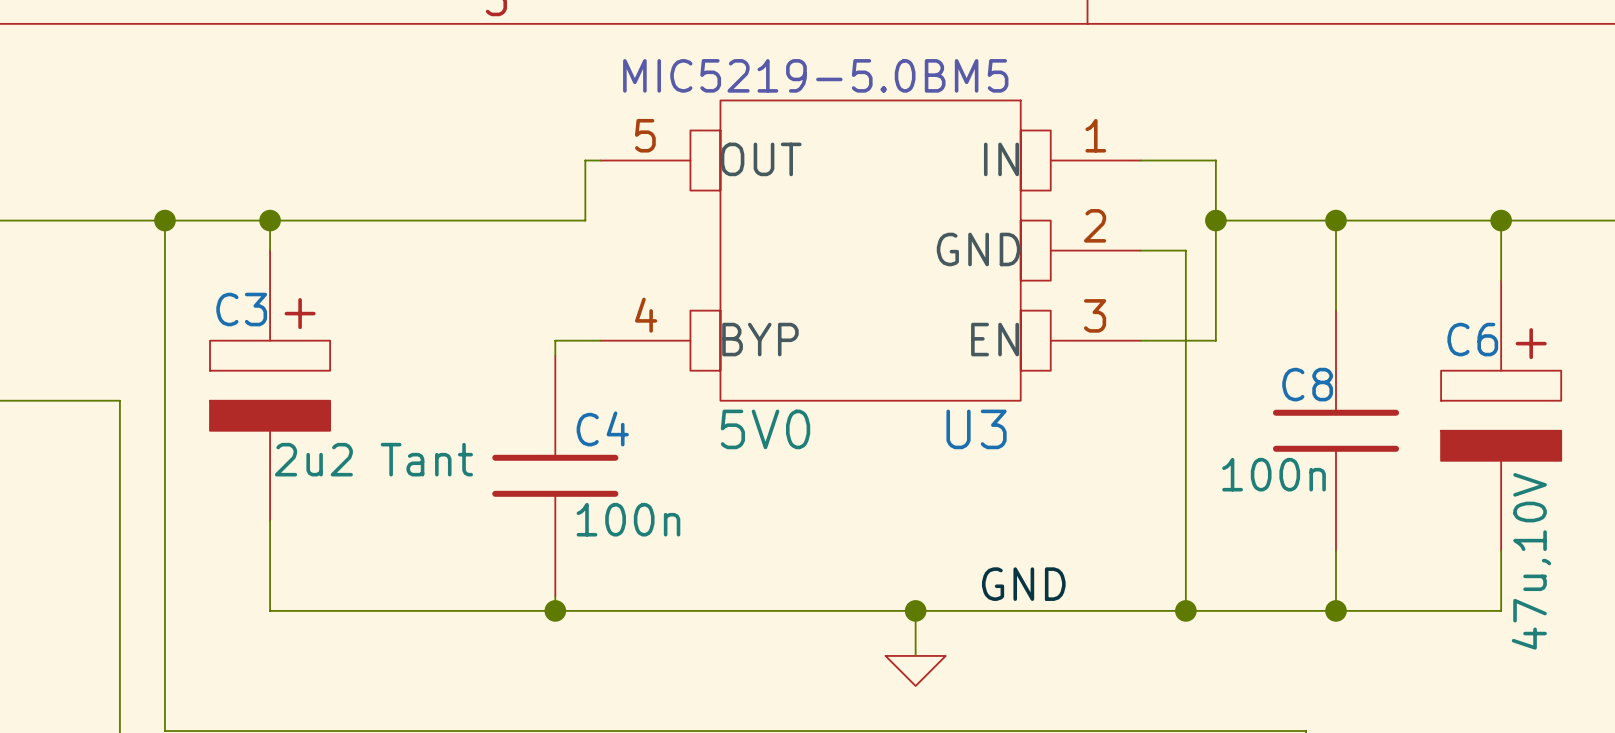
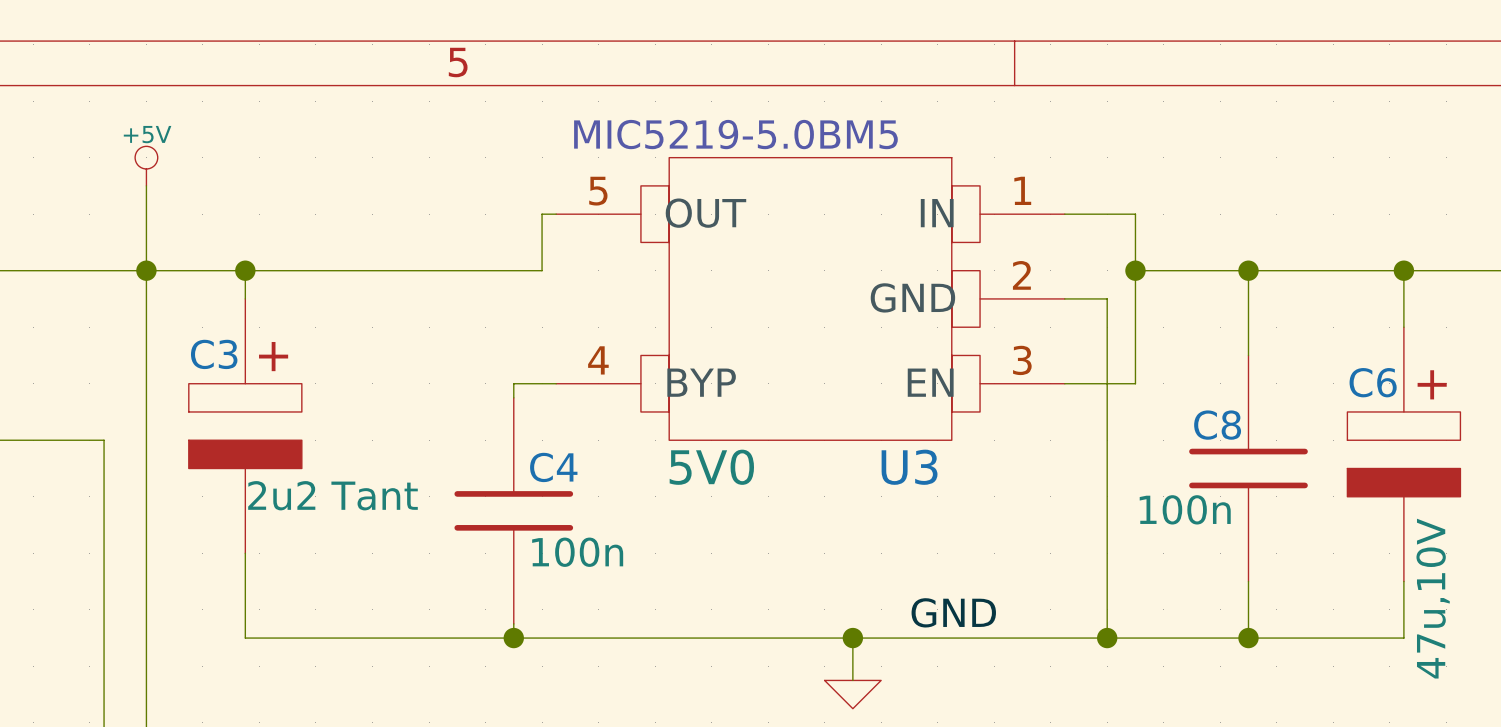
power symbol: none -> +5V (146, 166)
wire: none -> (146, 185) (146, 270)

